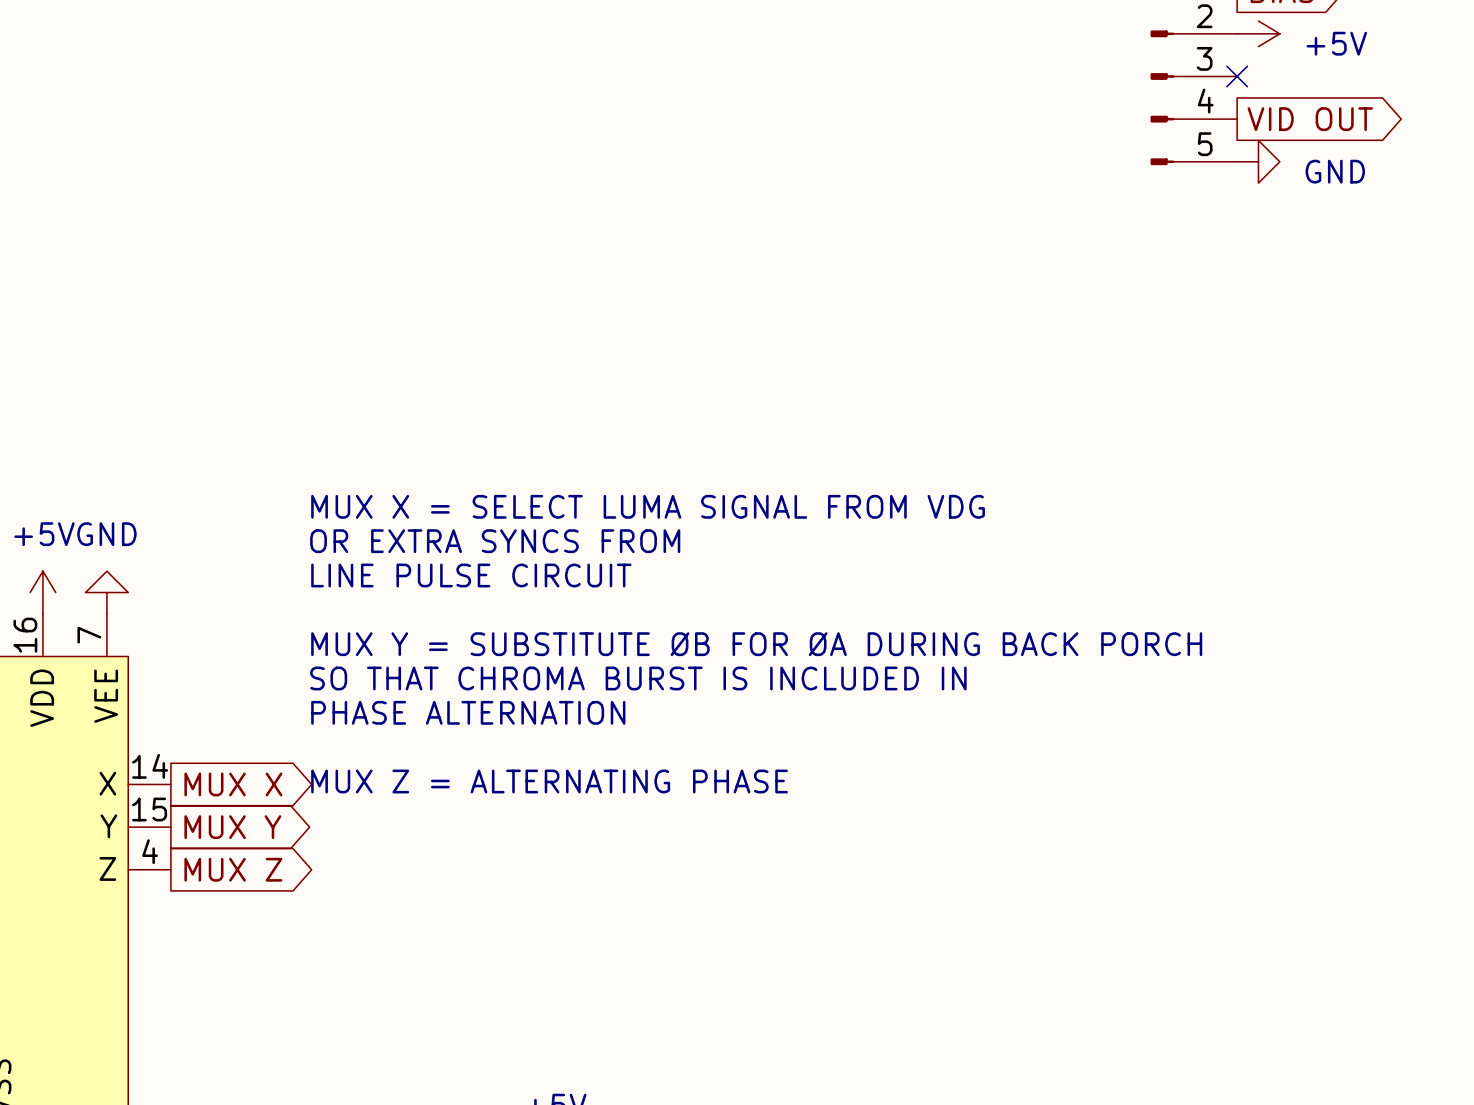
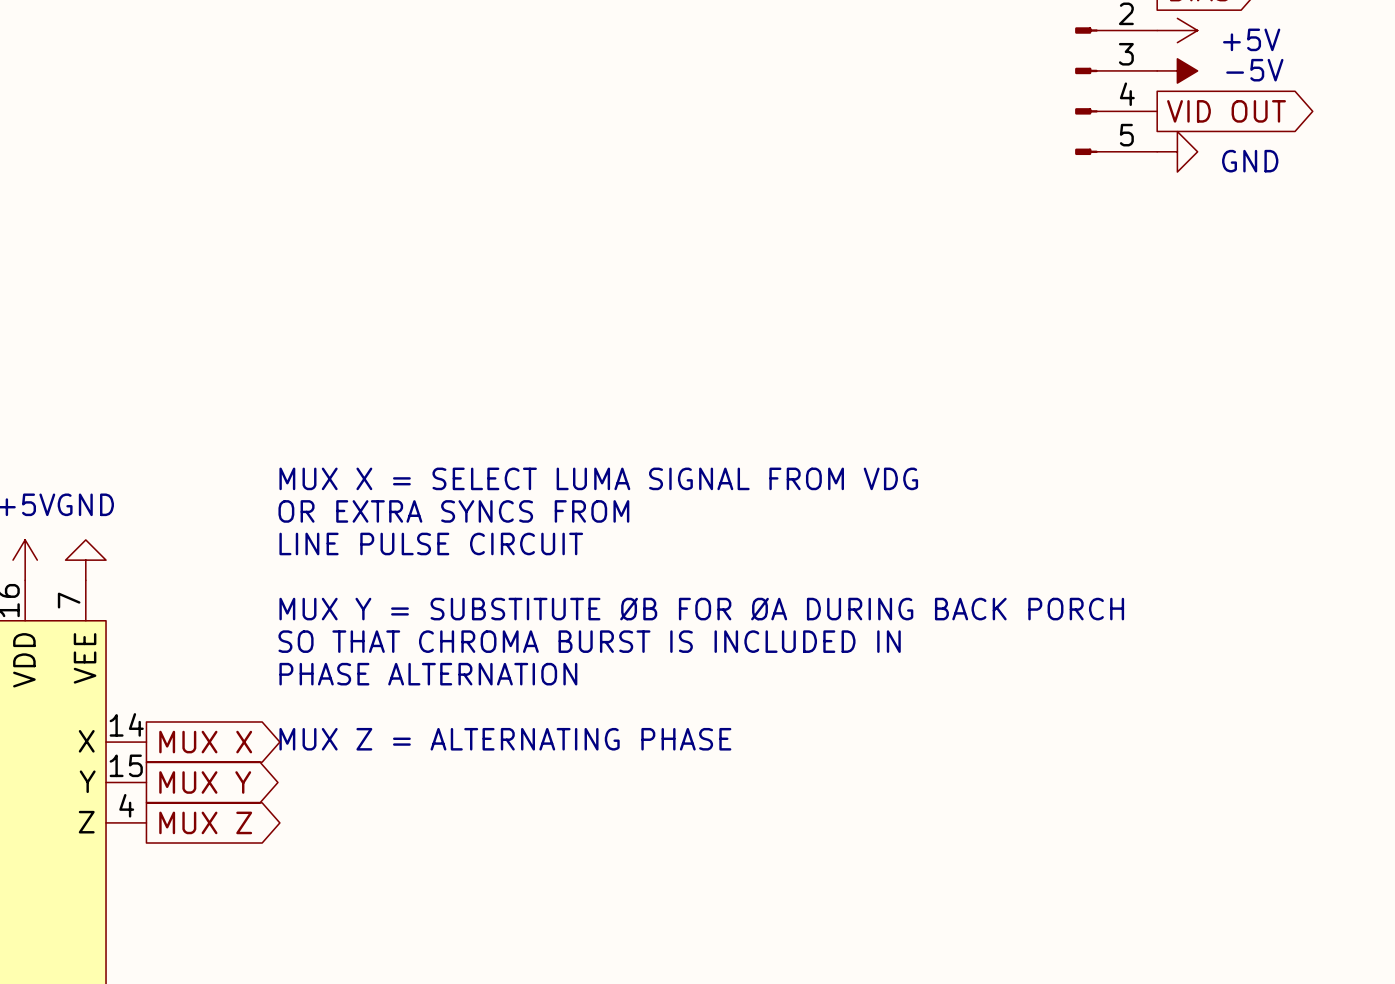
no-connect mark: (1237, 76) -> none
power symbol: none -> -5V (1177, 70)

